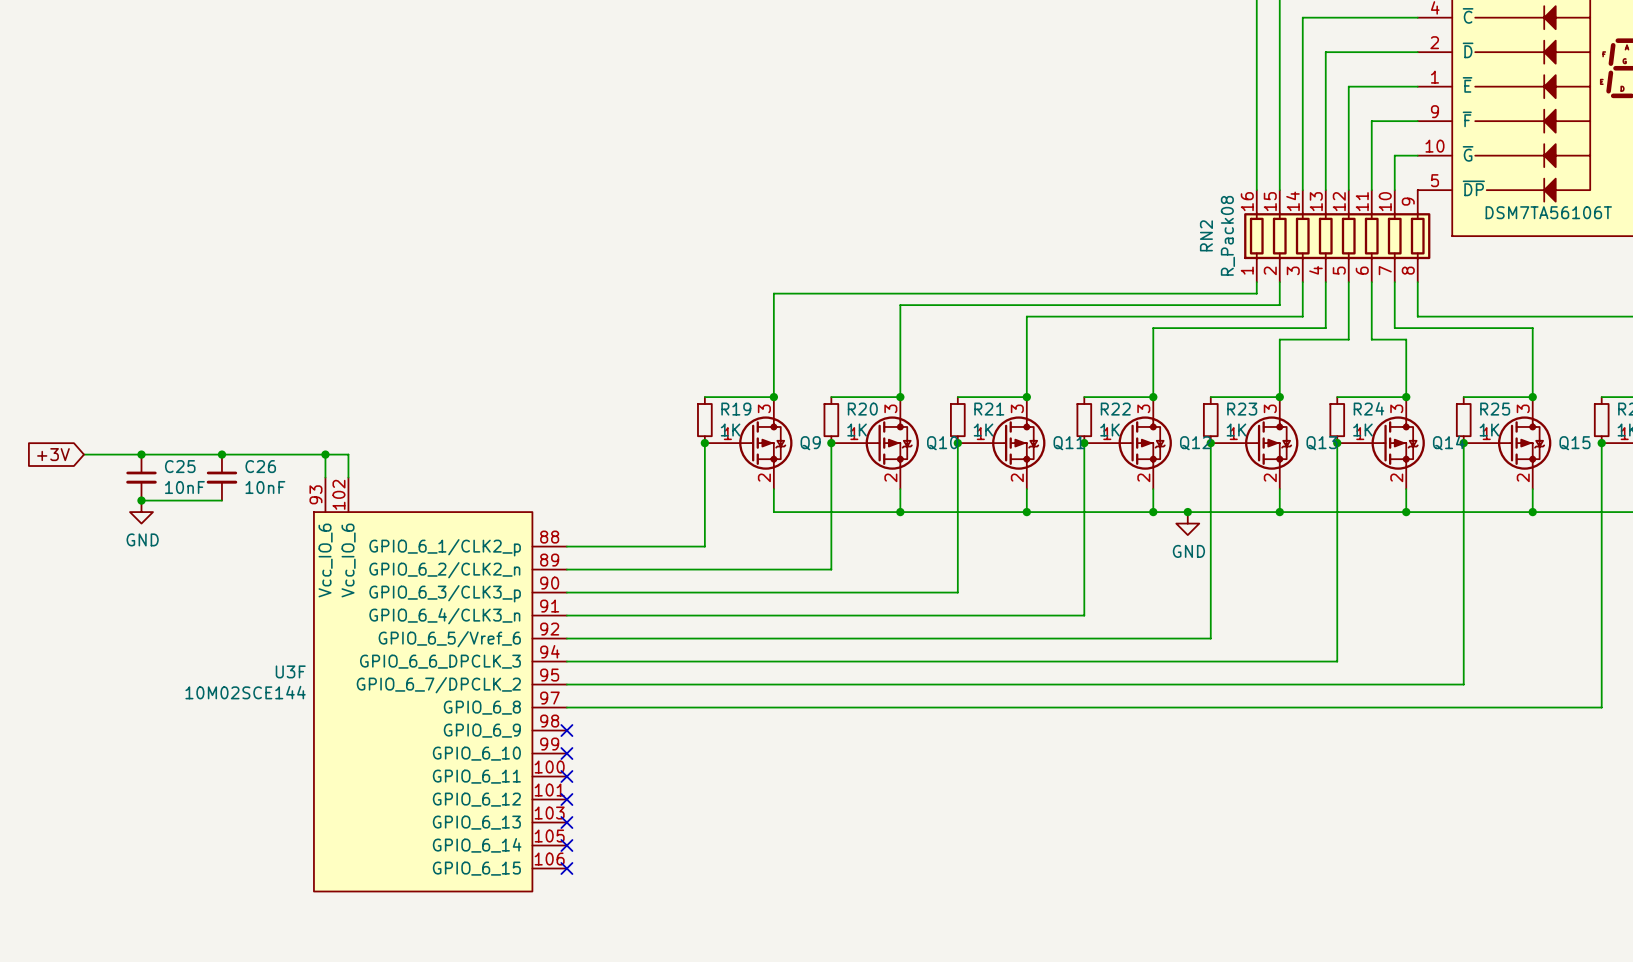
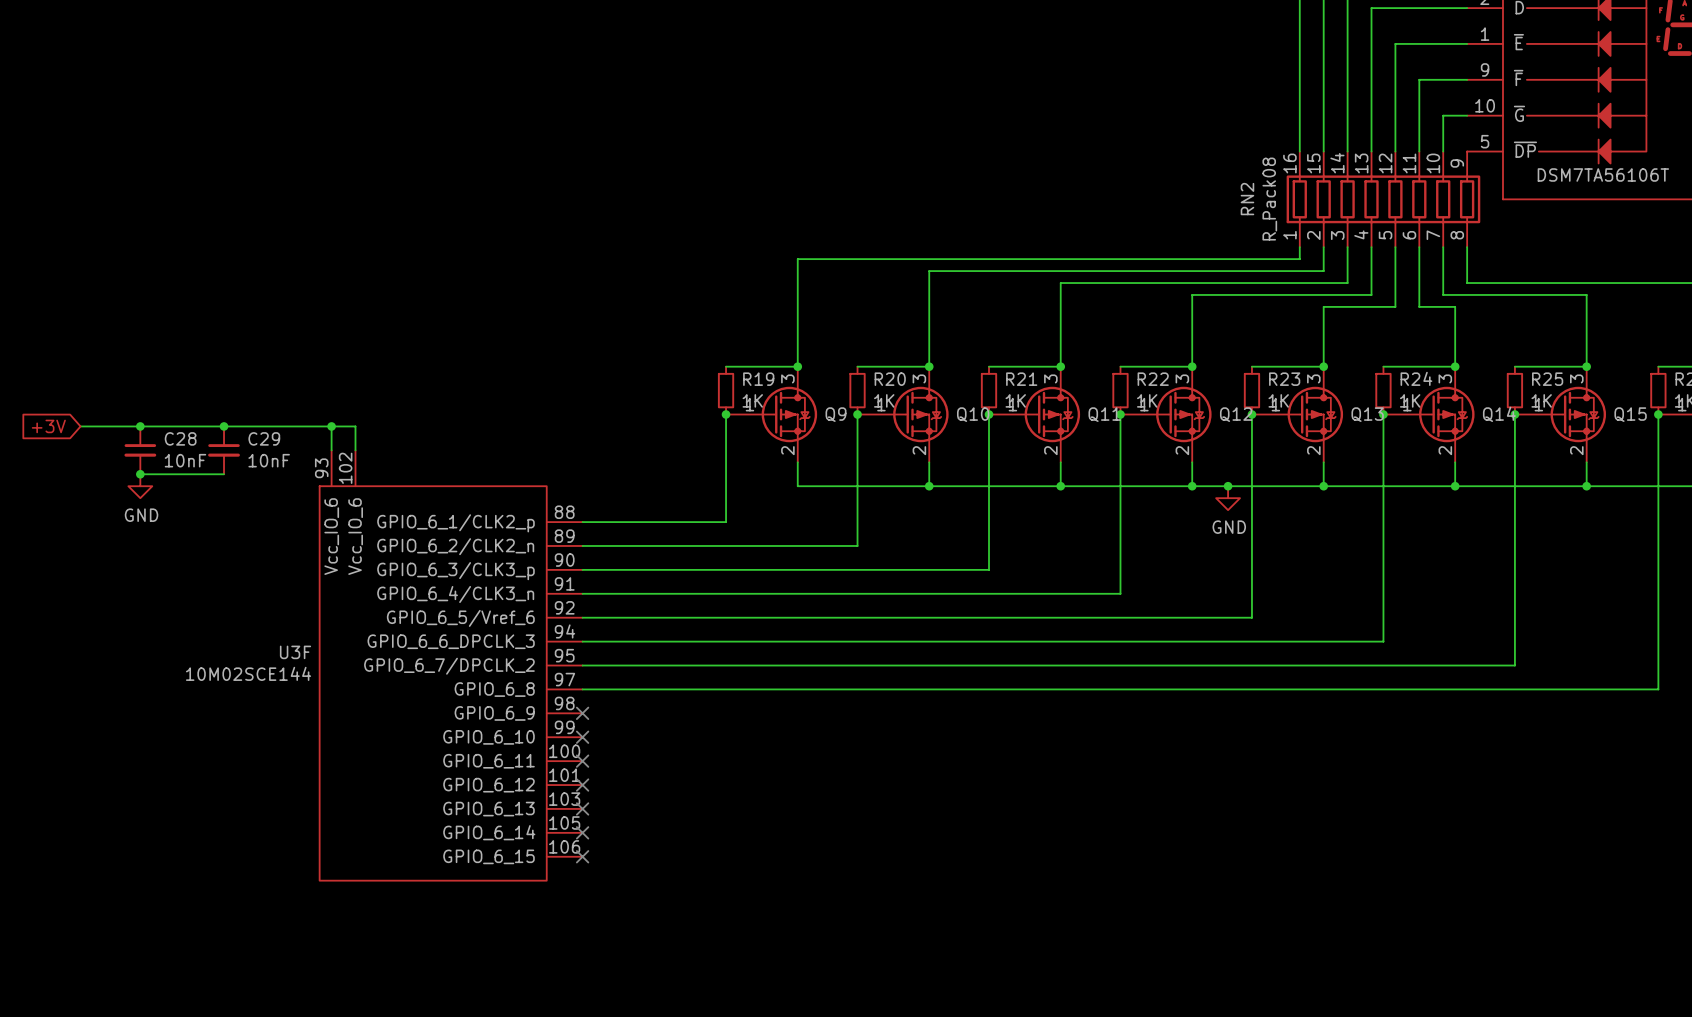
C25 name: C25 (180, 466) -> C28 (180, 438)
C26 name: C26 (260, 466) -> C29 (264, 438)

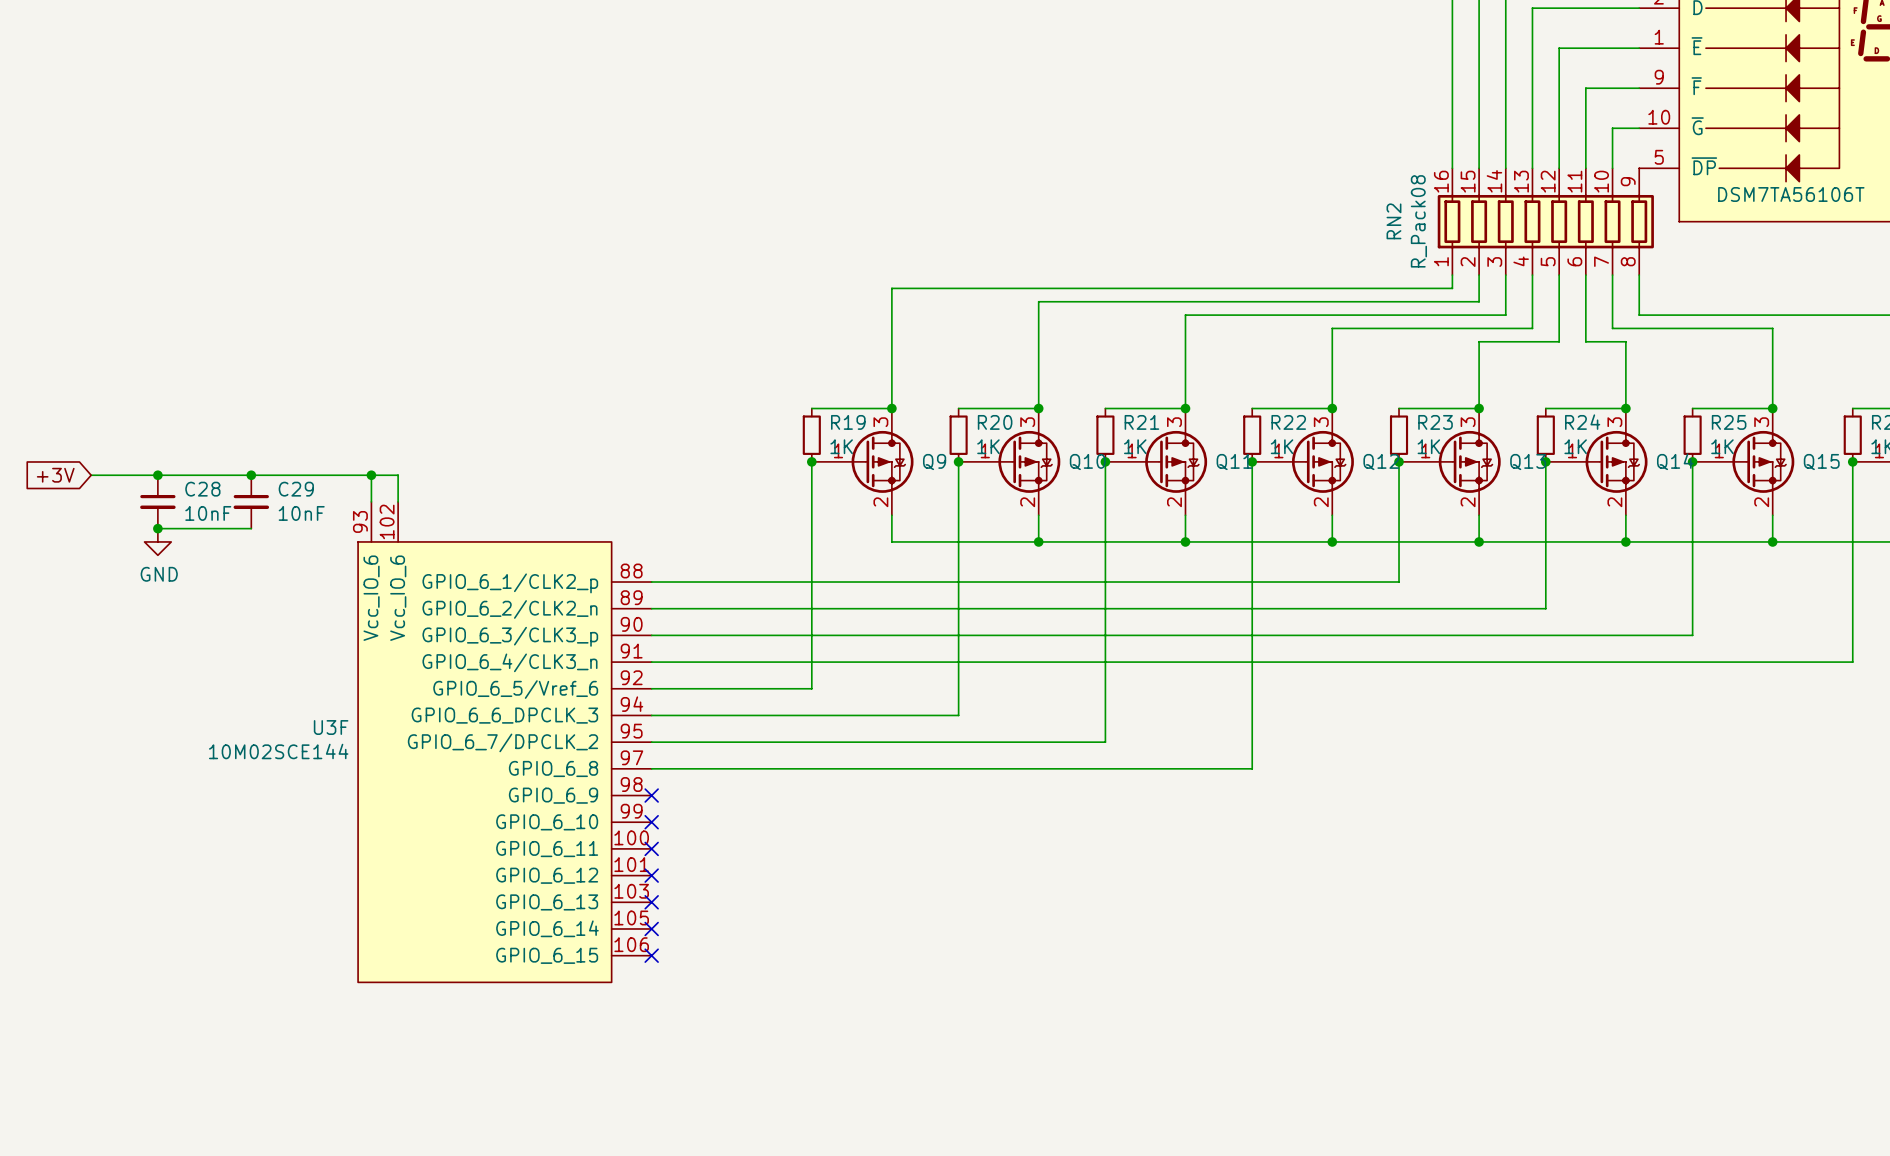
junction: (1228, 486) -> none
power symbol: GND (1228, 498) -> none
wire: (1251, 522) (1251, 617) (726, 617) -> (1399, 582) (811, 582) (811, 688)
wire: (1383, 545) (1383, 641) (857, 641) -> (1545, 608) (958, 608) (958, 715)
wire: (1514, 569) (1514, 665) (989, 665) -> (1692, 635) (1105, 635) (1105, 742)
wire: (1658, 593) (1658, 689) (1120, 689) -> (1852, 662) (1252, 662) (1252, 768)

